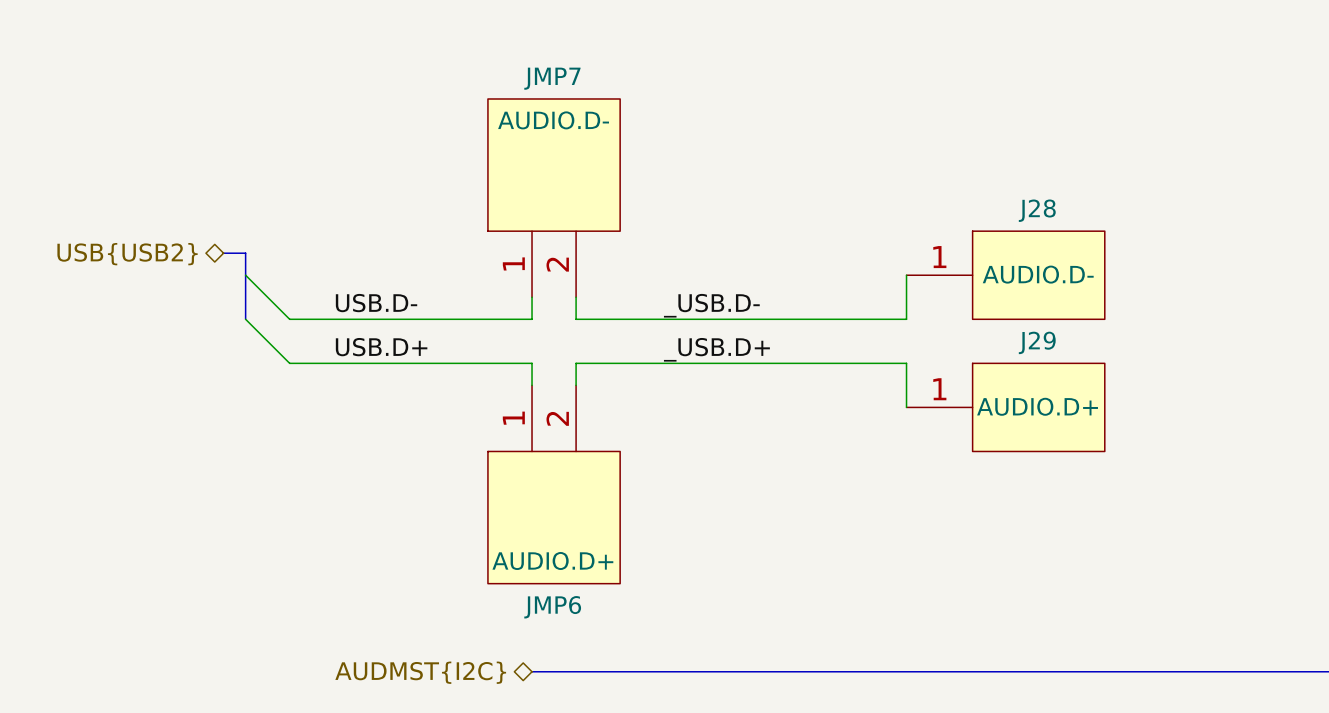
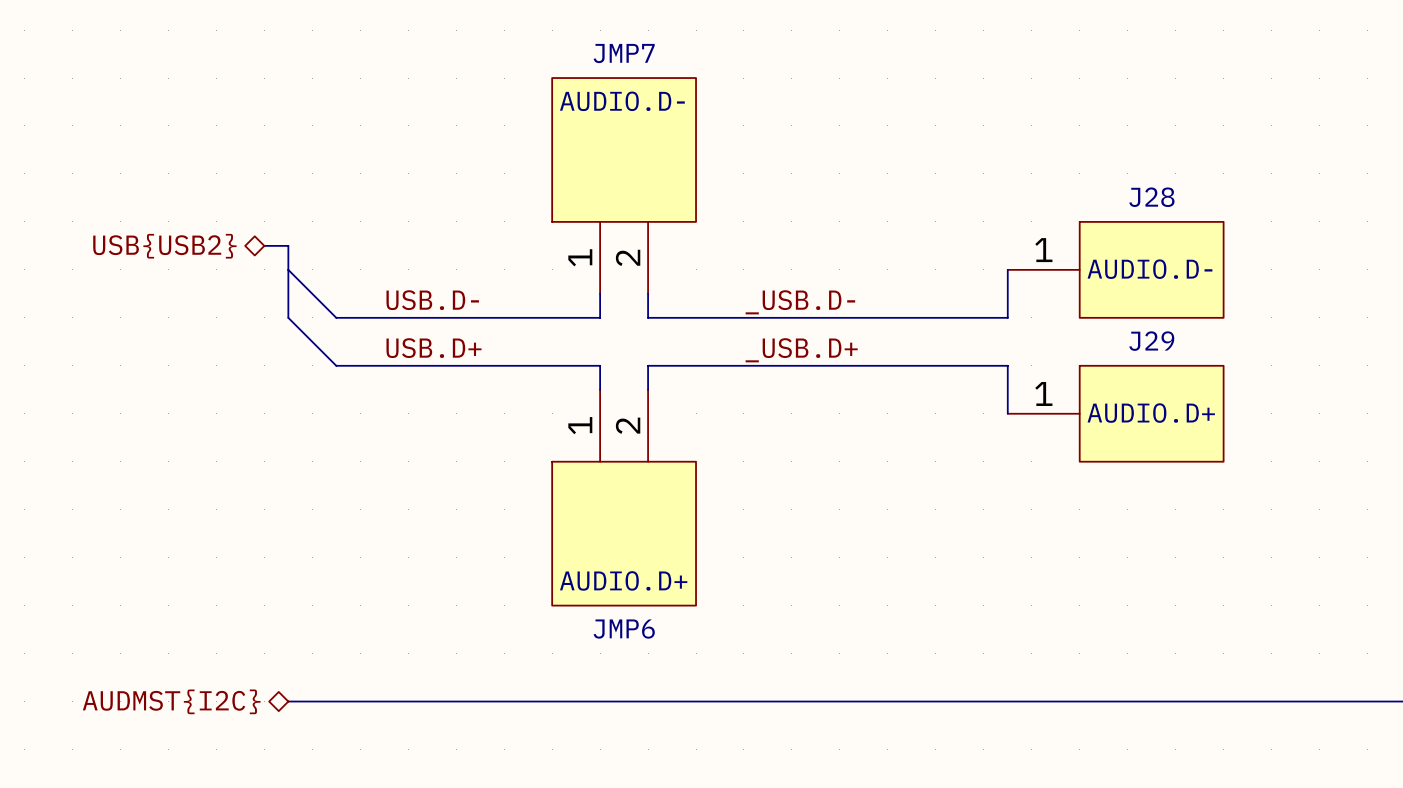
bus: none -> (288, 701) (600, 701)
hierarchical label position: AUDMST{I2C} (420, 672) -> AUDMST{I2C} (171, 701)

